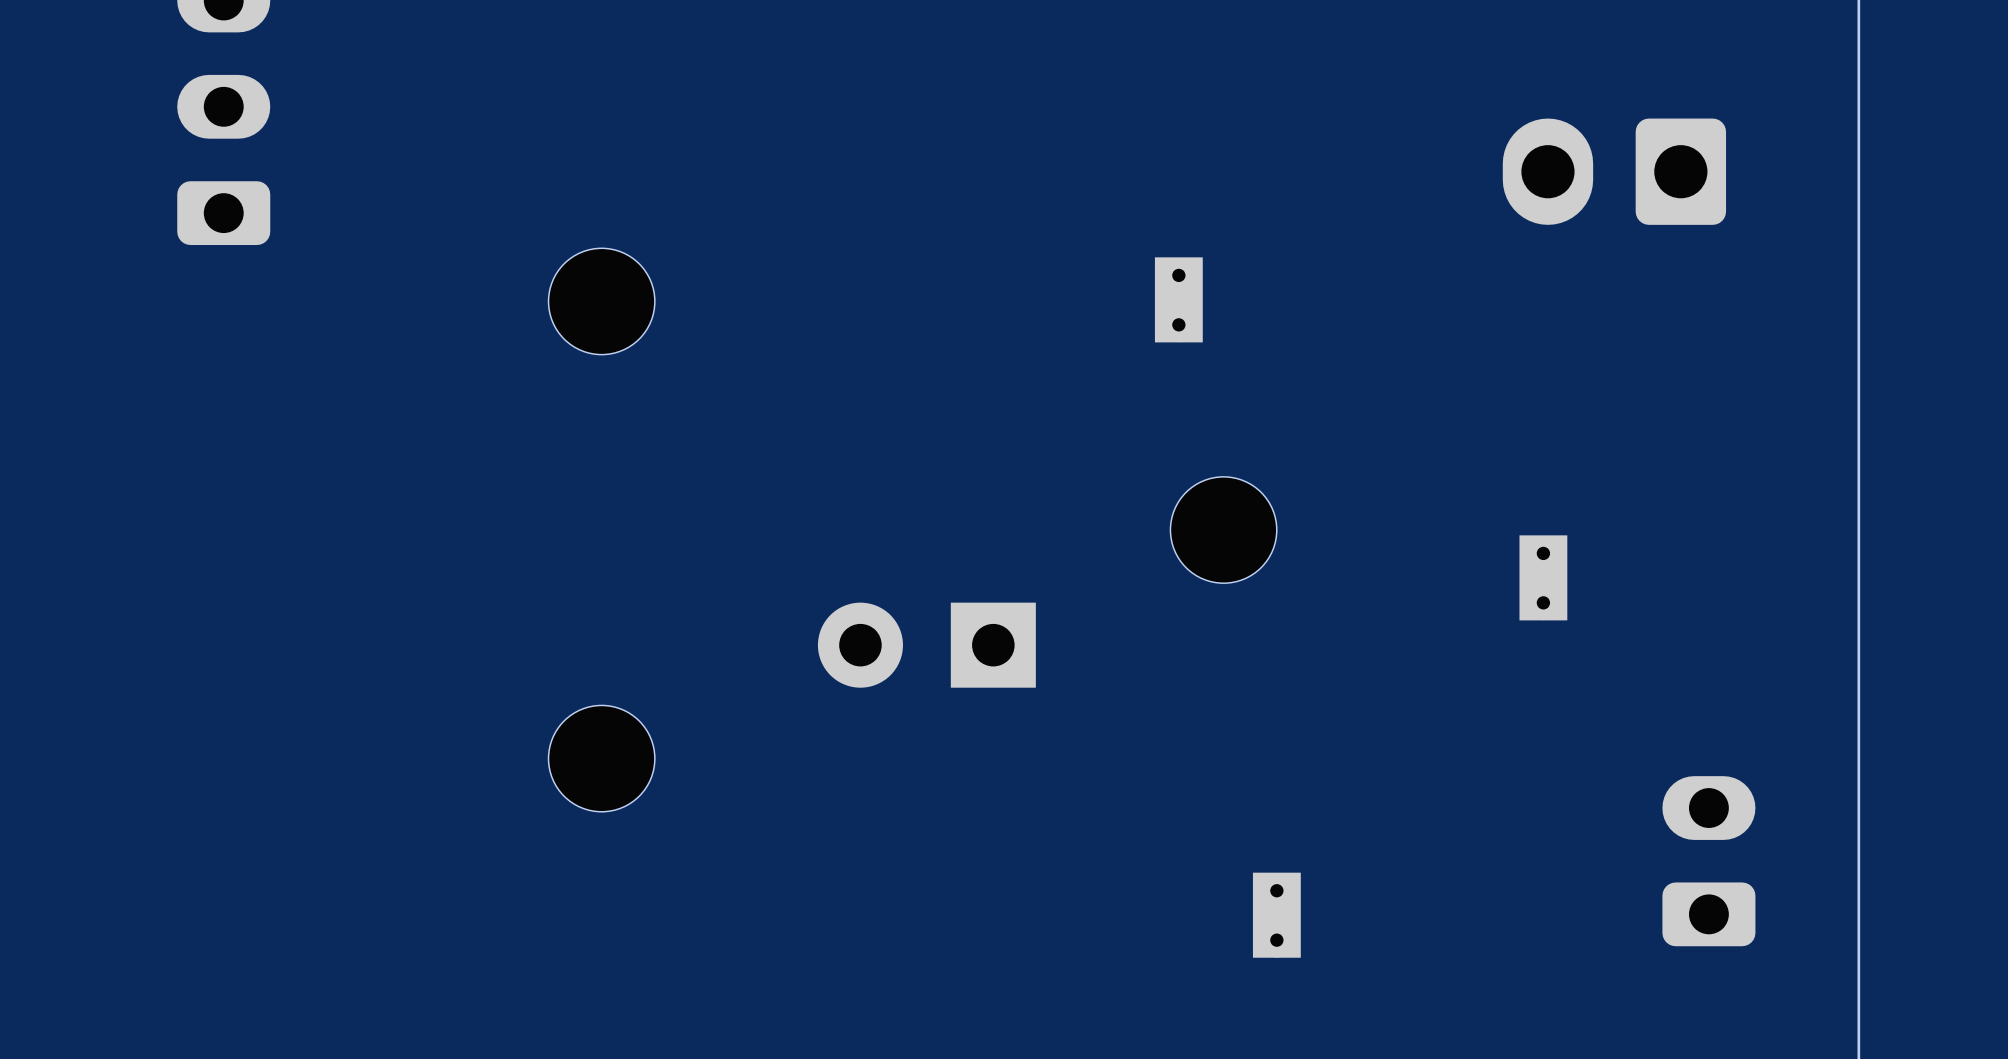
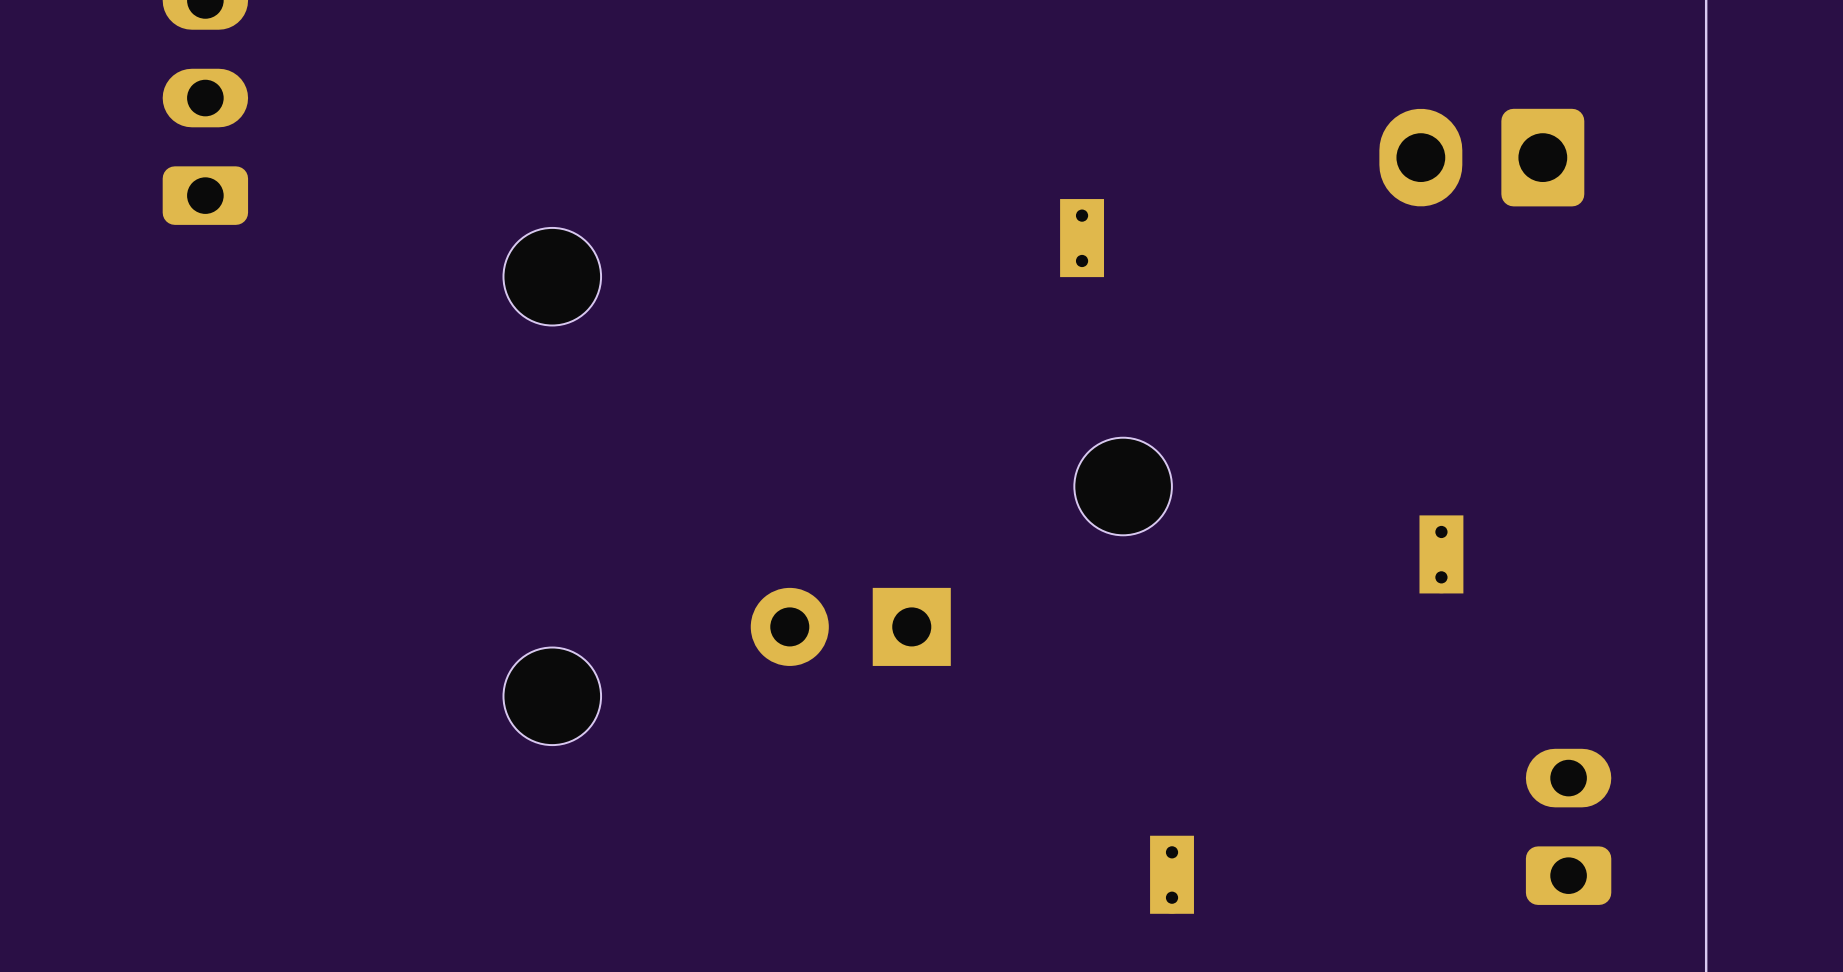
part position: (1178, 299) -> (1082, 238)
part position: (1543, 577) -> (1441, 554)
part position: (926, 645) -> (850, 626)
part position: (1708, 861) -> (1568, 826)
part position: (1276, 915) -> (1172, 874)

